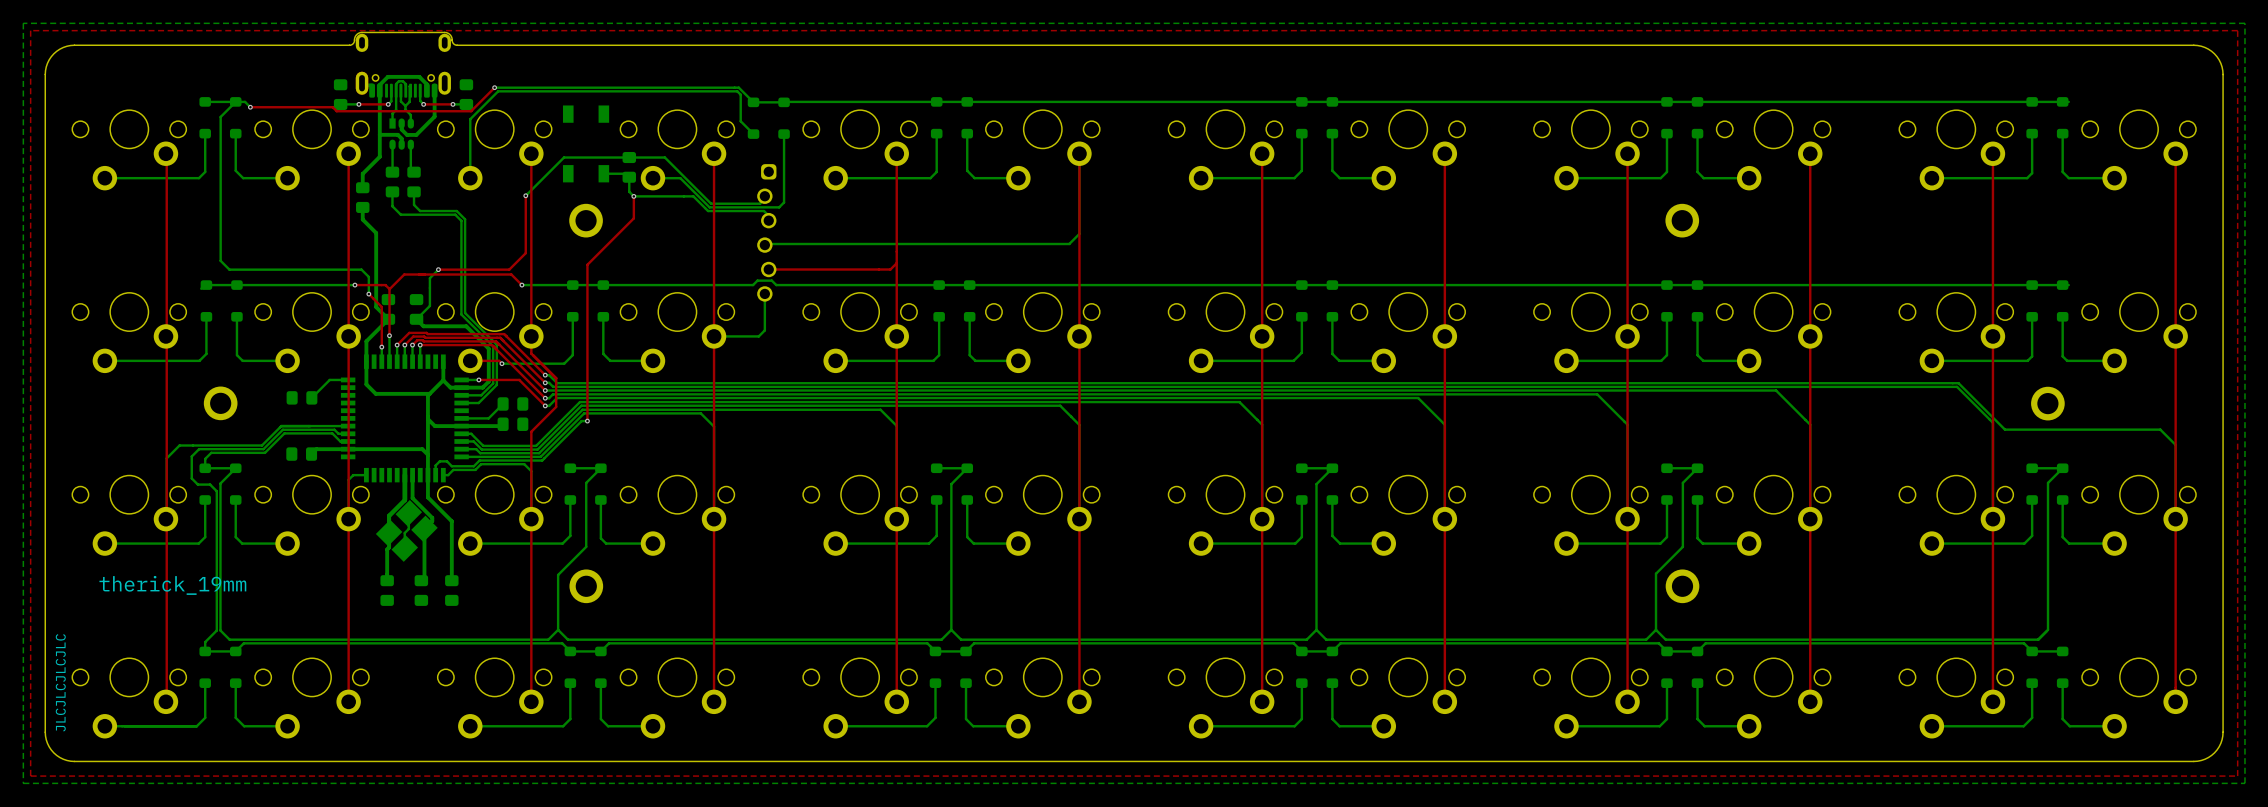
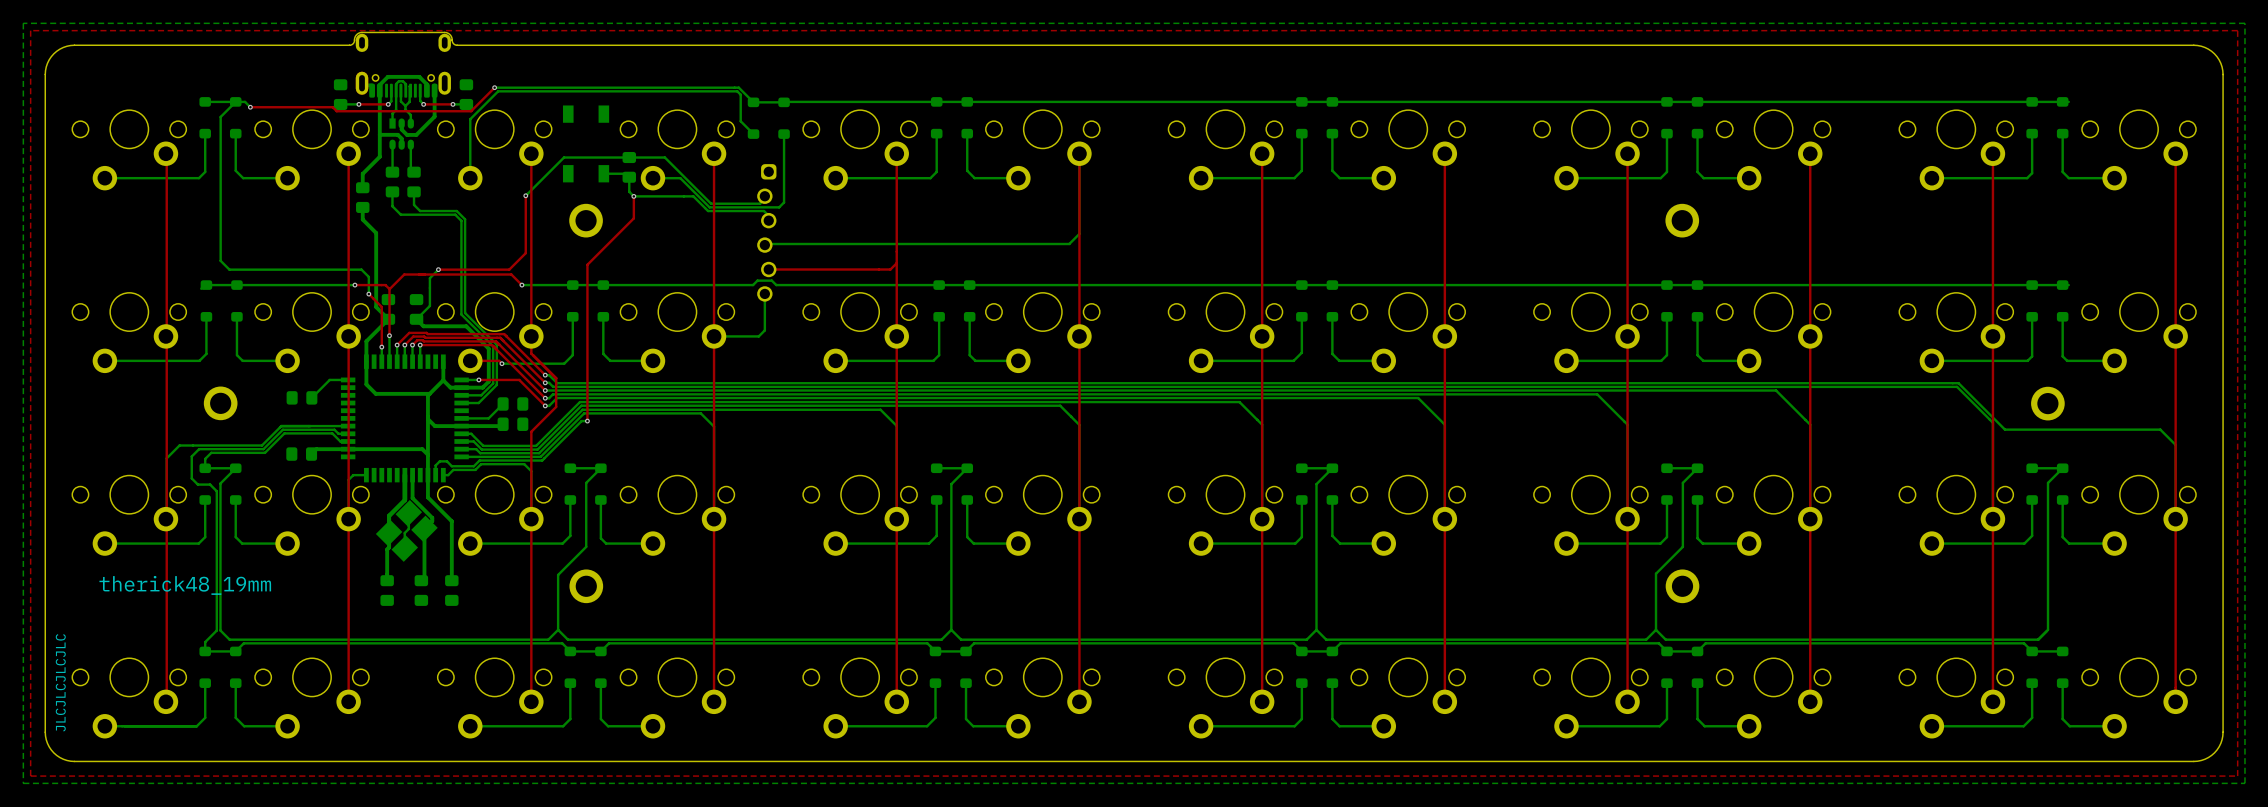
text: therick_19mm (172, 585) -> therick48_19mm (185, 585)

